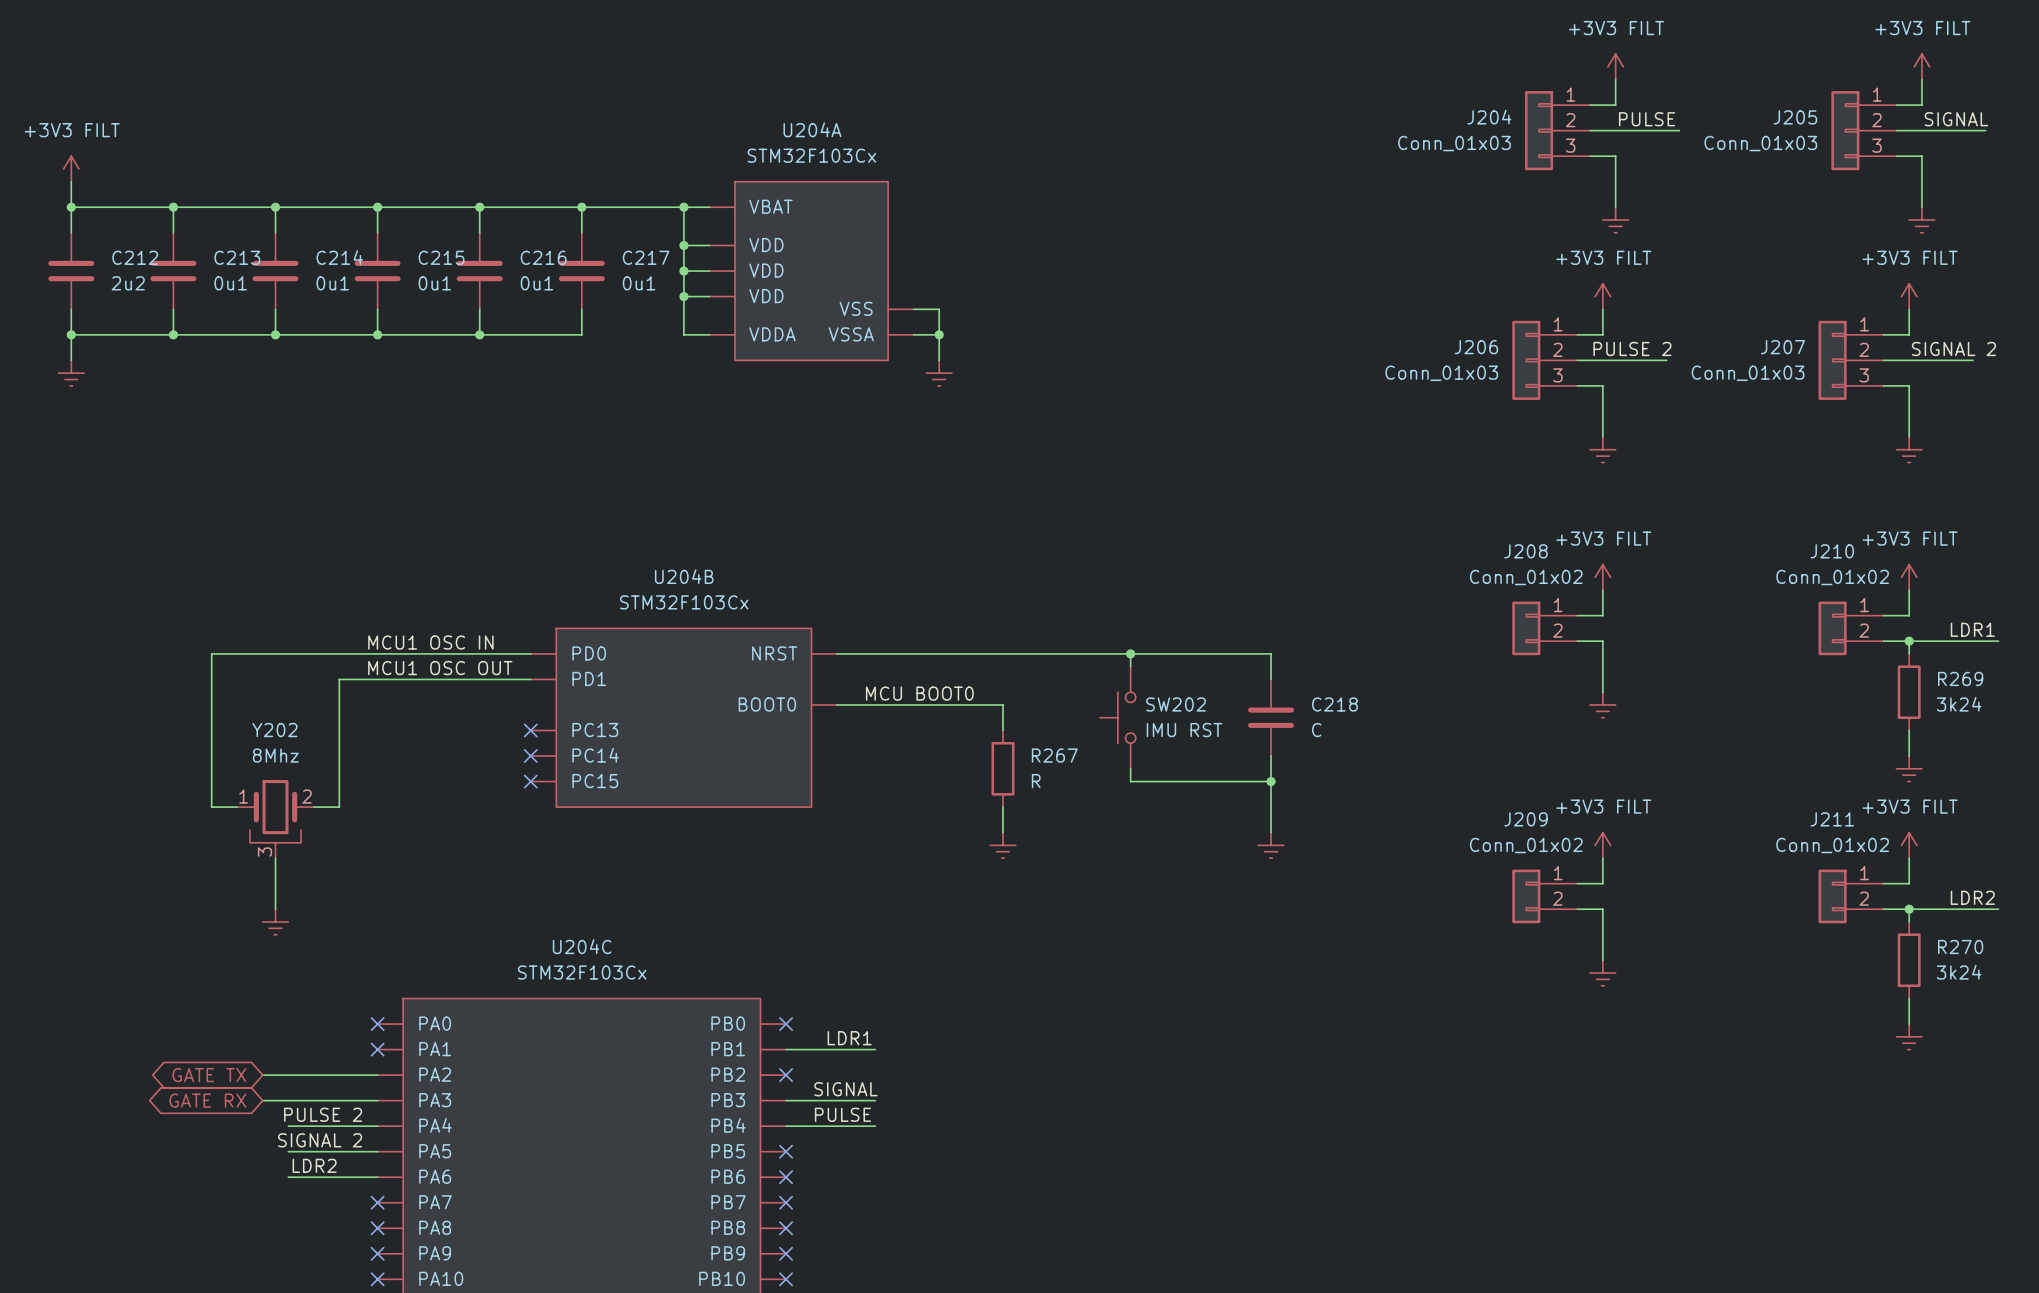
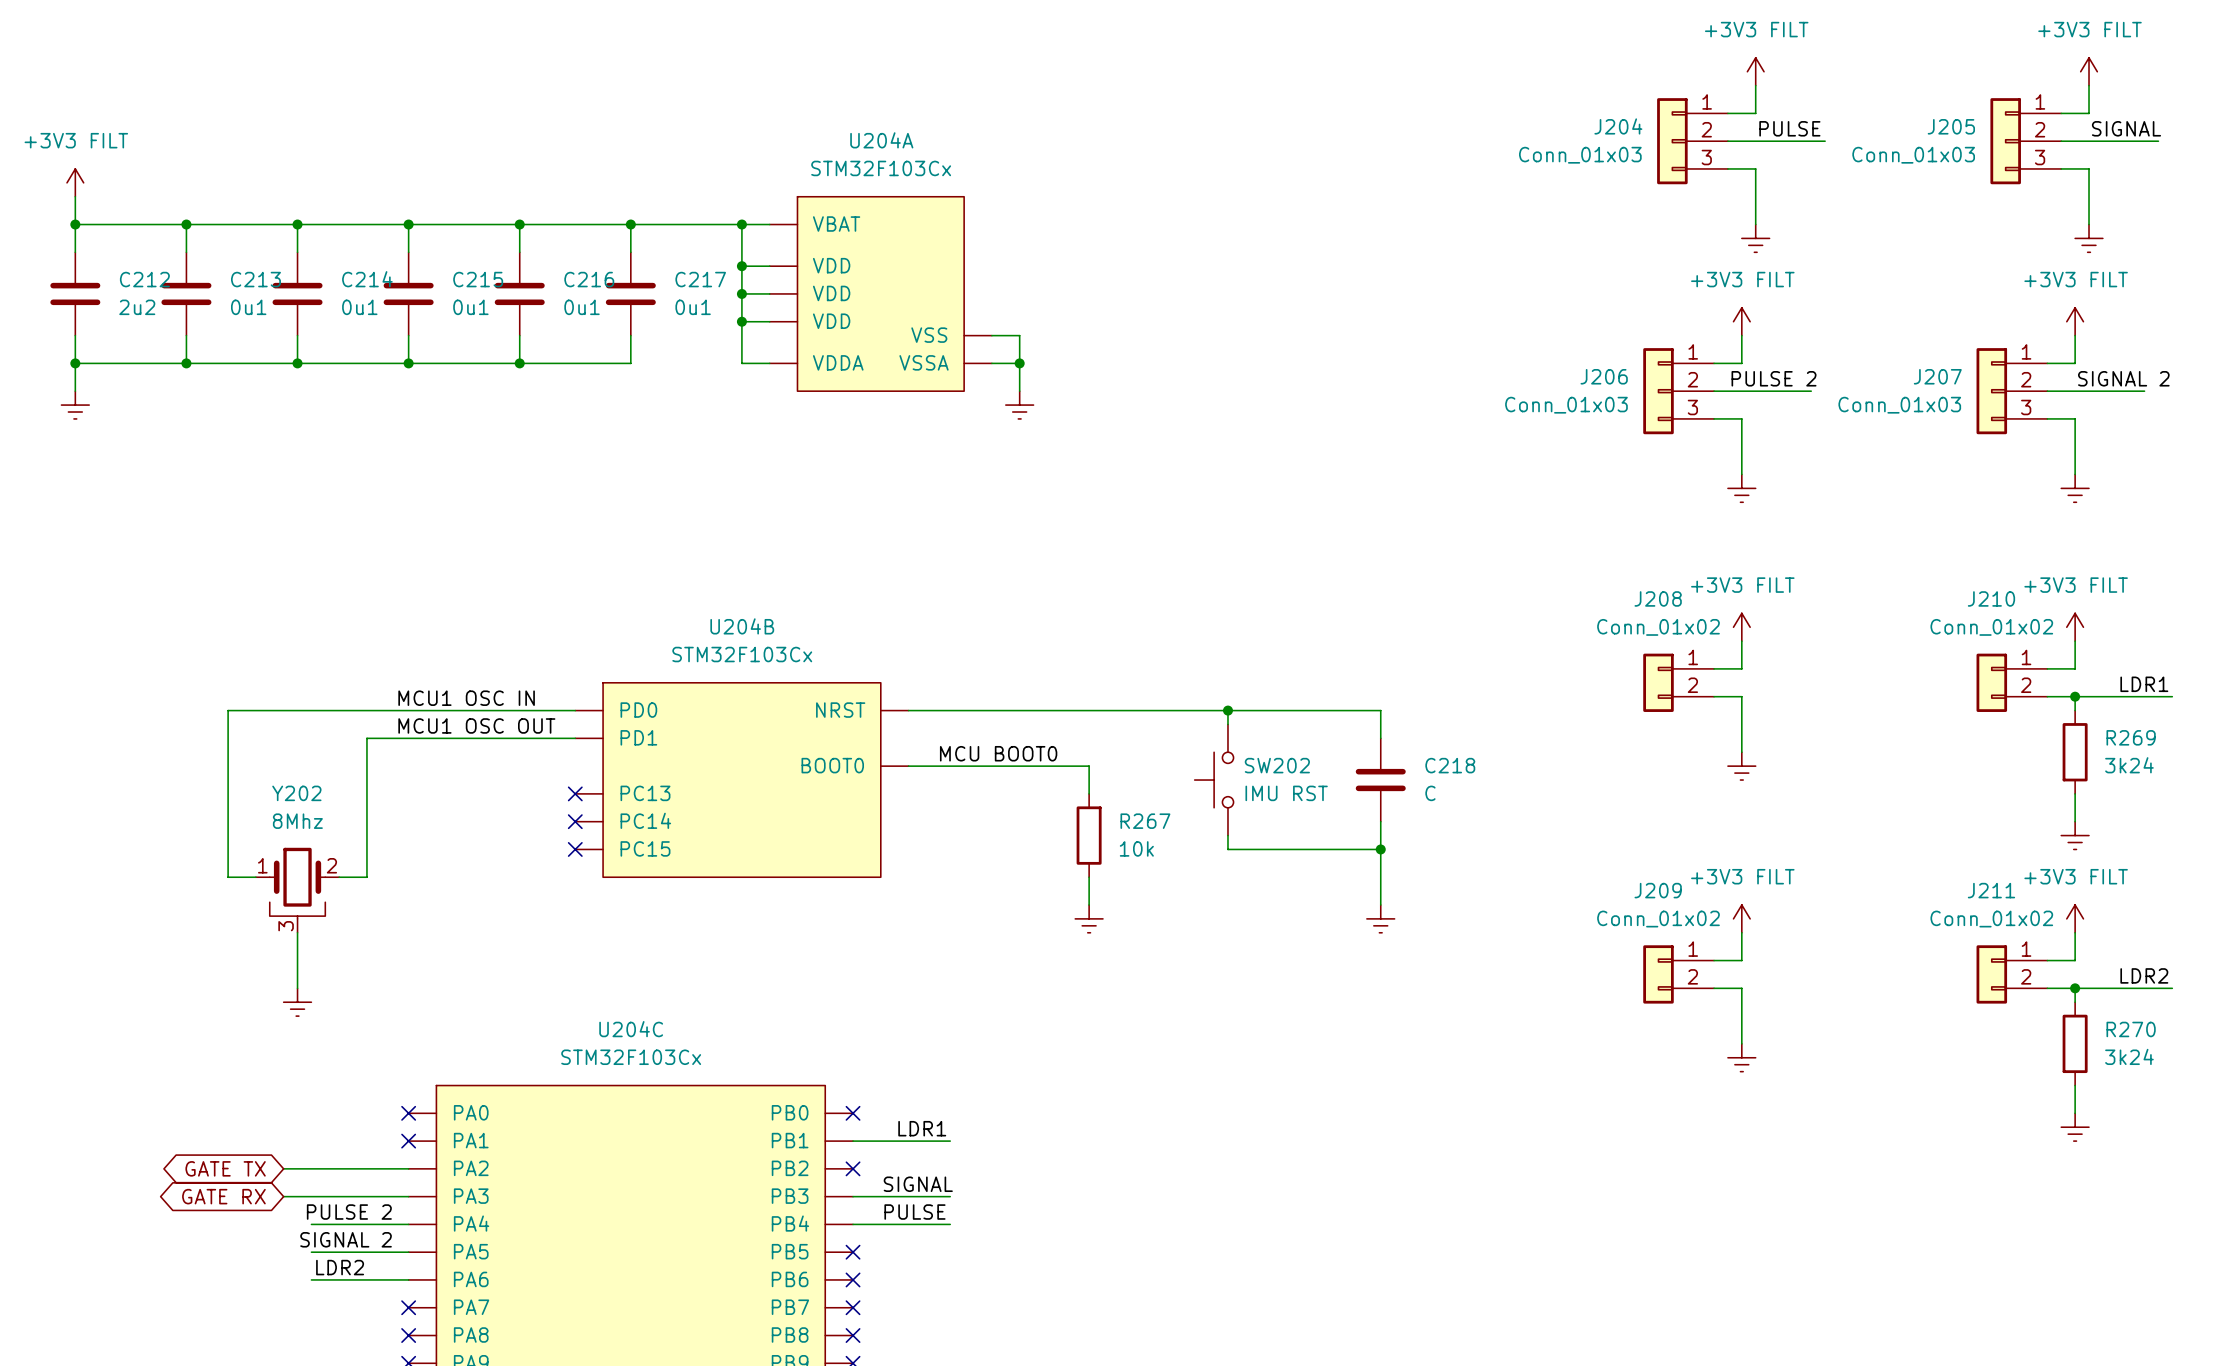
R267 value: R (1036, 781) -> 10k (1136, 848)

